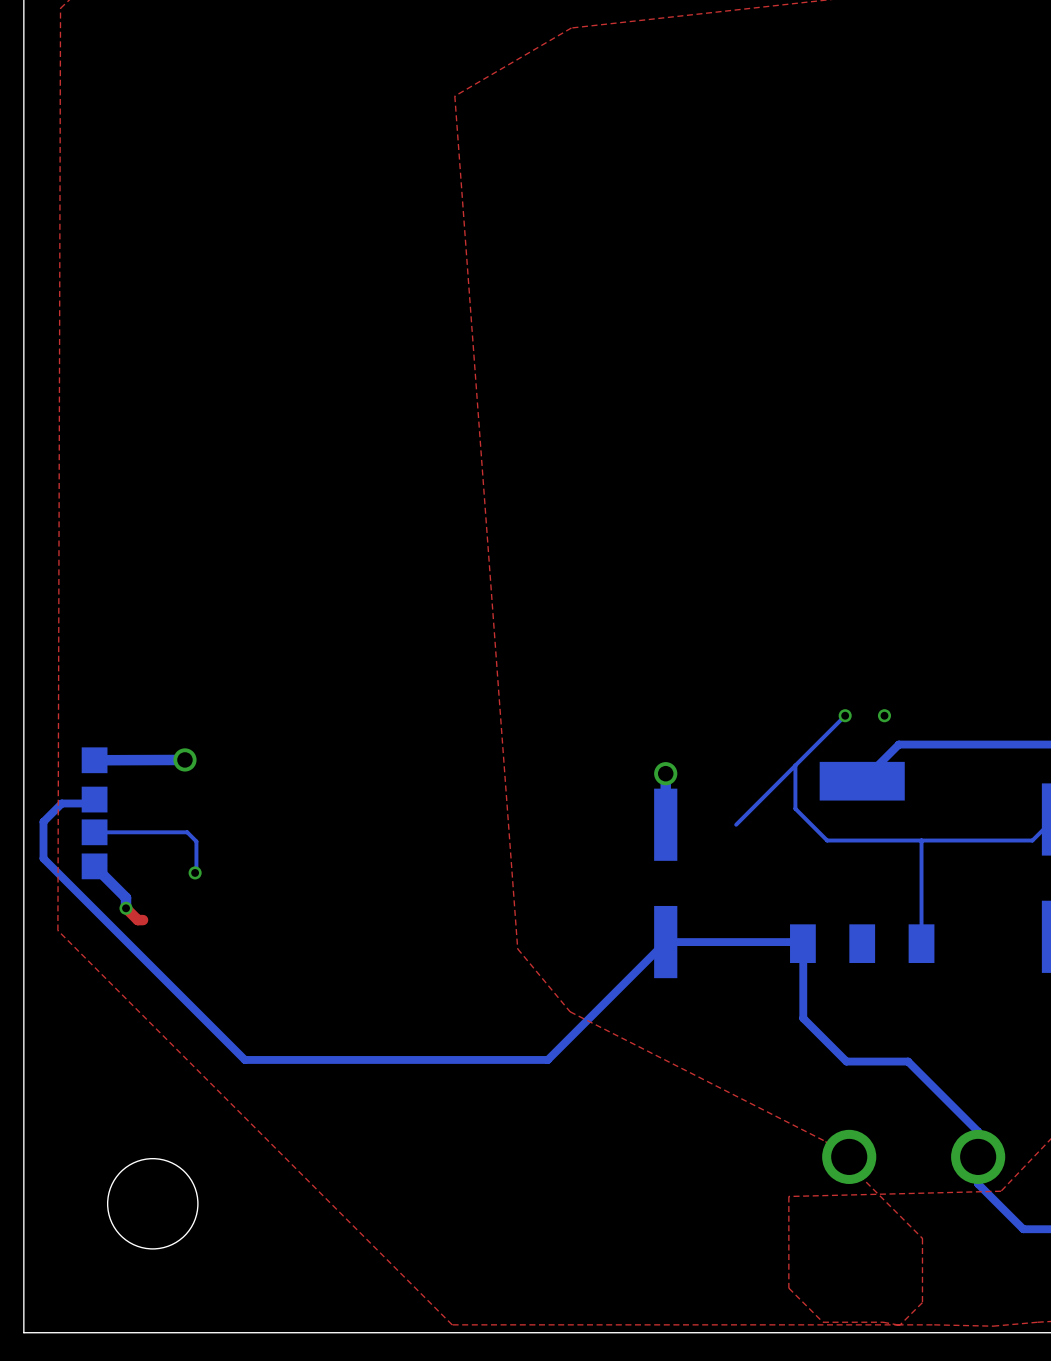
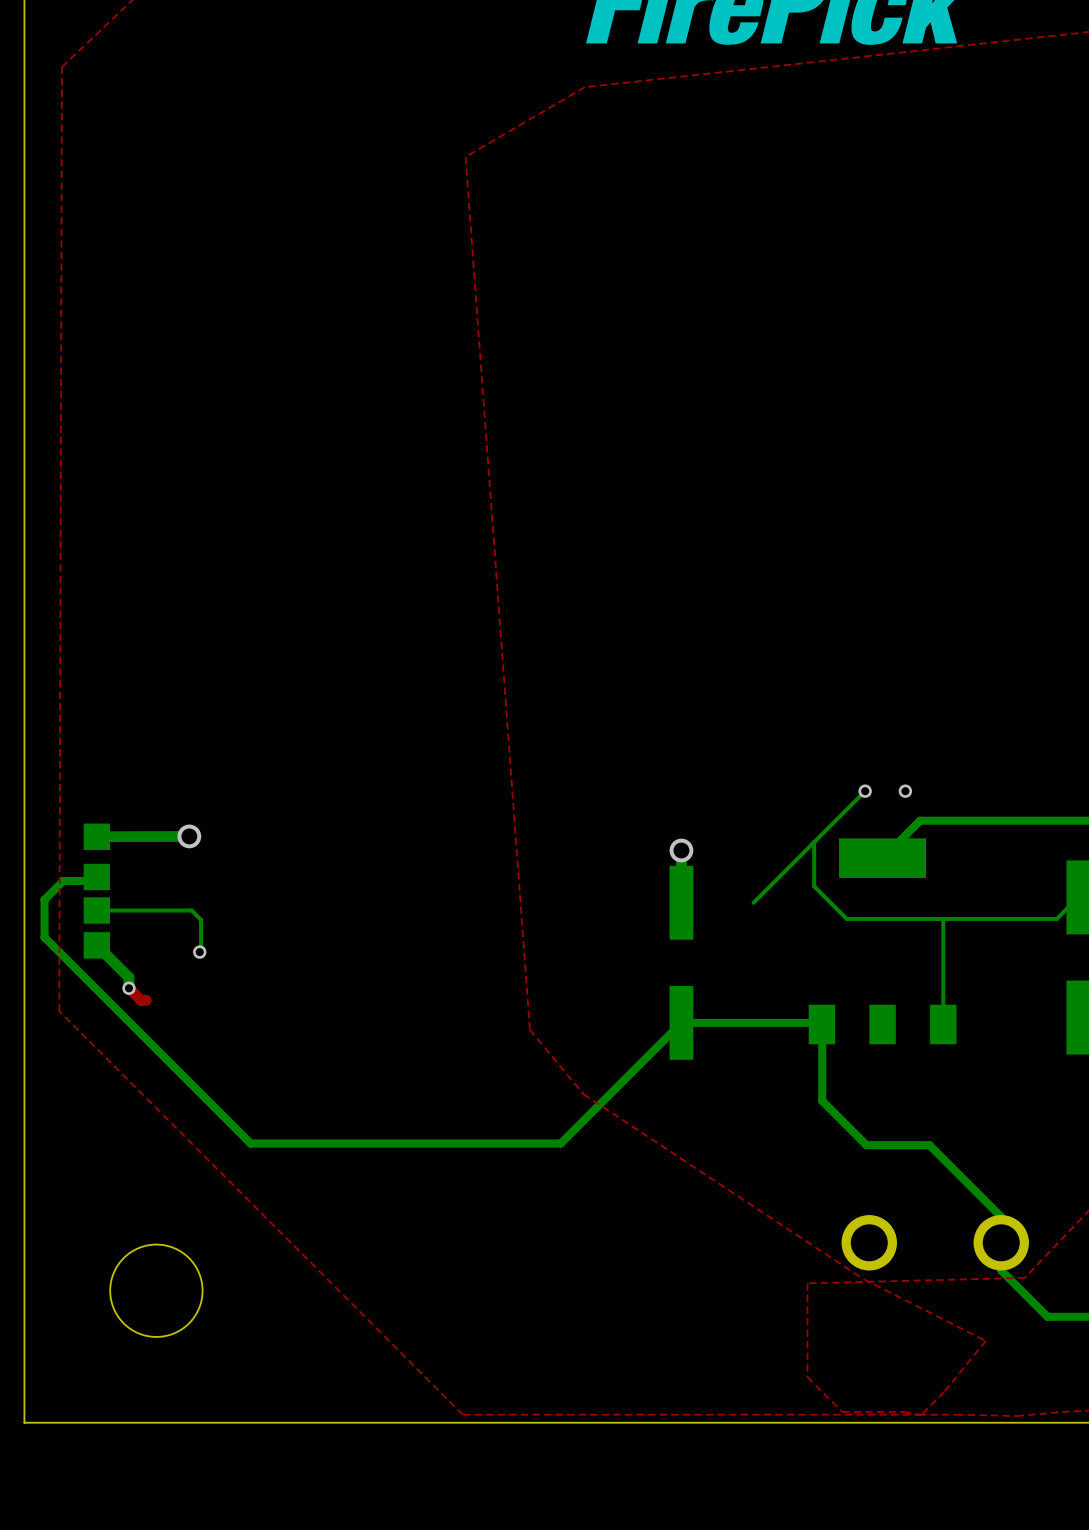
top zone outline: (570, 1011) (825, 1141) (922, 1238) (922, 1302) -> (583, 1094) (863, 1279) (985, 1340) (944, 1391)

